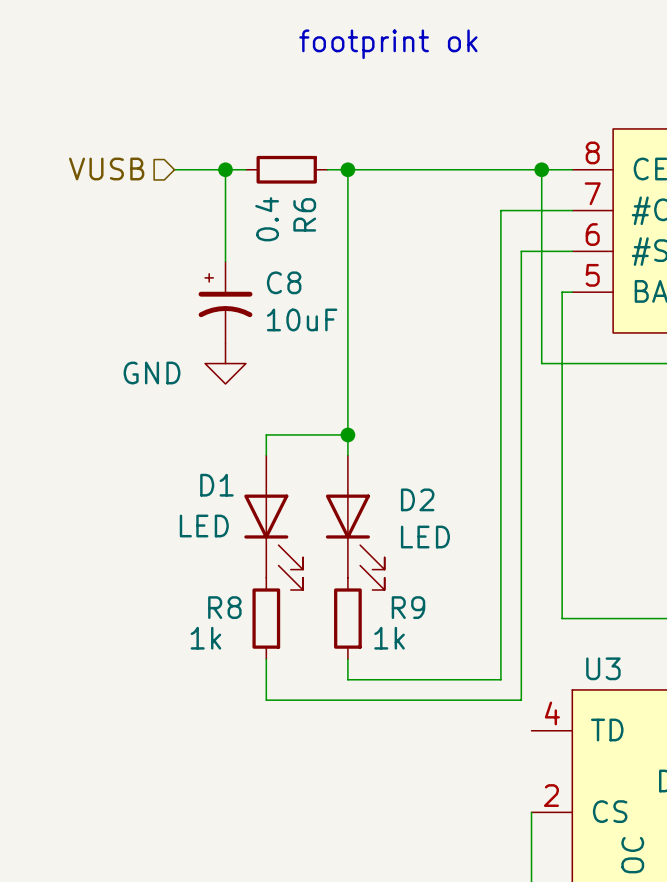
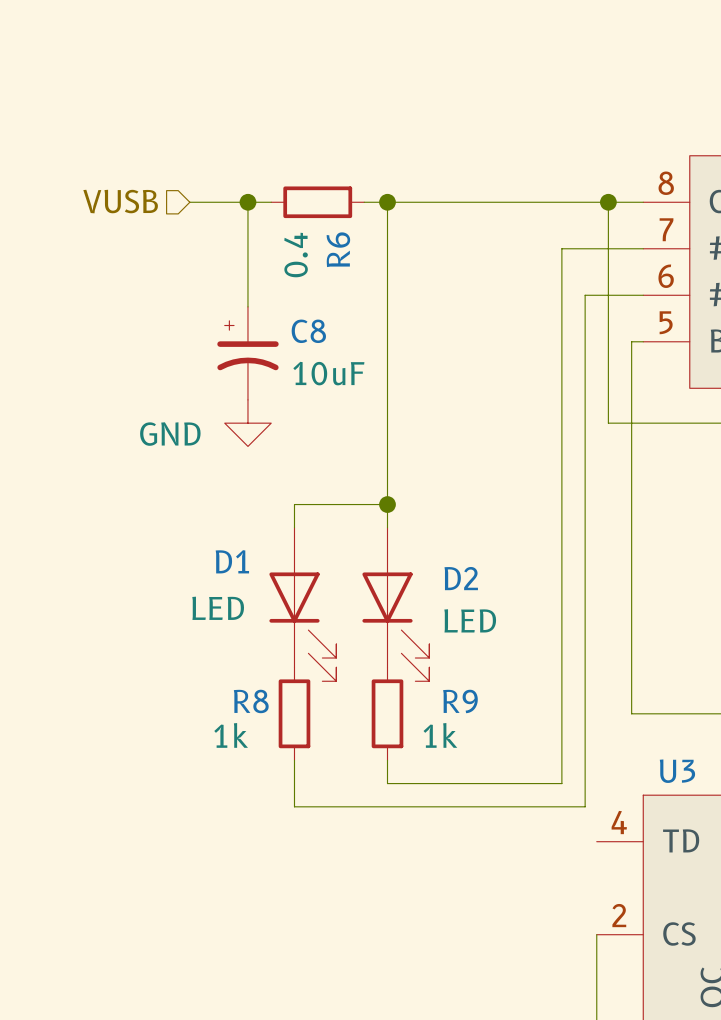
text: footprint ok (388, 44) -> none

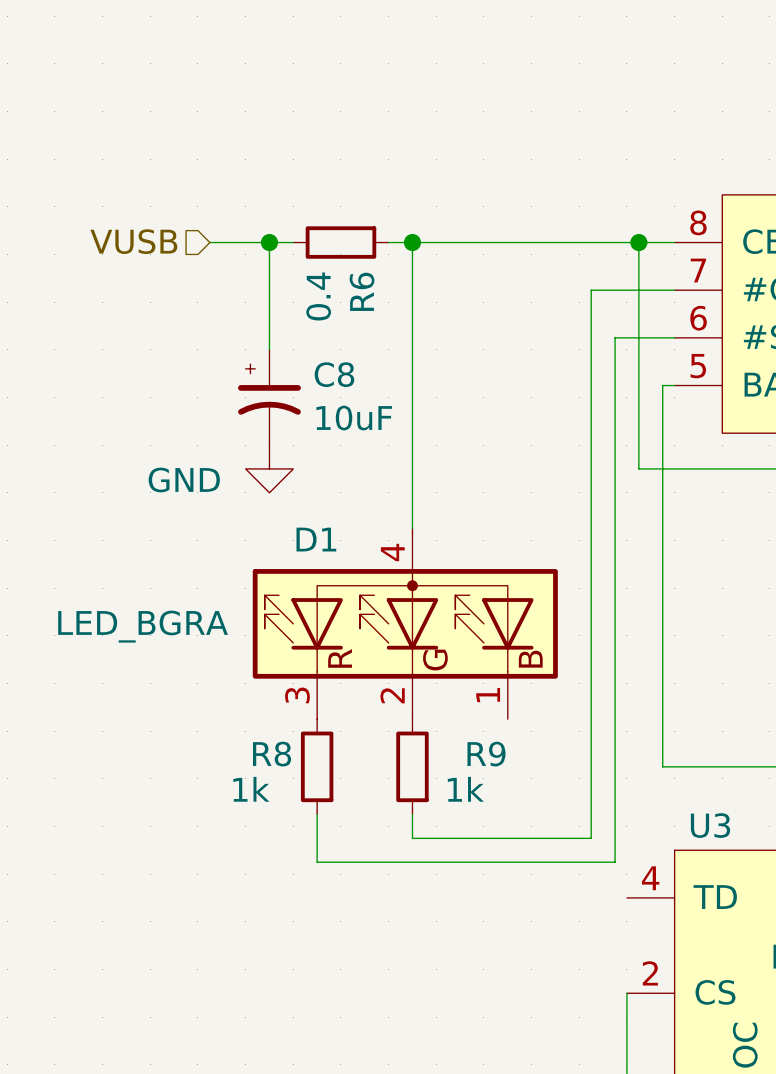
wire: (387, 504) (294, 504) (294, 527) -> none
junction: (387, 504) -> none
D1 symbol: [269, 527, 337, 682] -> [252, 528, 558, 720]
D1 name position: D1 (232, 561) -> D1 (316, 539)
D2: LED (395, 604) -> none
D1 value: LED (218, 608) -> LED_BGRA (143, 626)

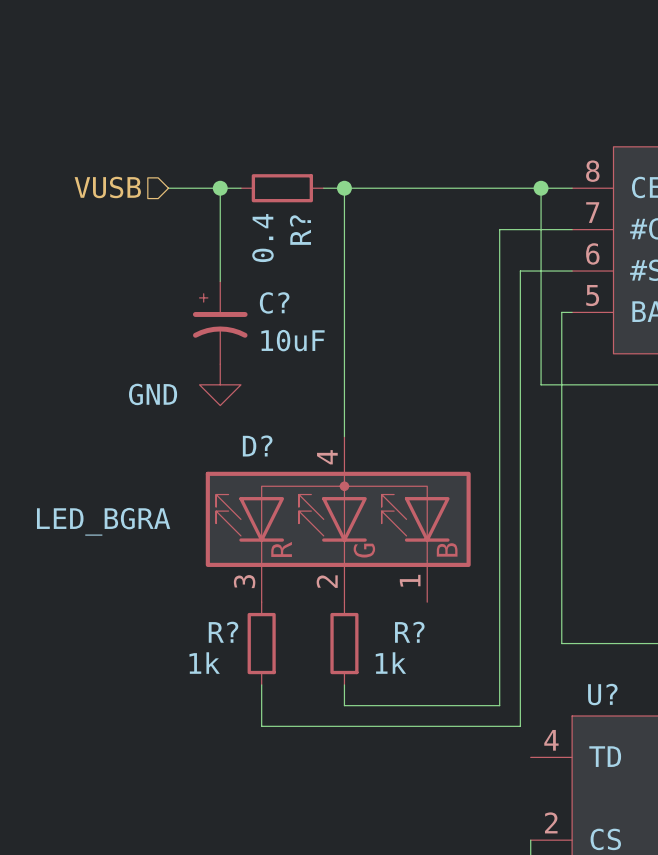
R6 name: R6 (362, 291) -> R? (300, 230)
C8 name: C8 (334, 374) -> C? (274, 302)
D1 name: D1 (316, 539) -> D? (257, 445)
R8 name: R8 (272, 754) -> R? (223, 632)
R9 name: R9 (486, 754) -> R? (409, 632)
U3 name: U3 (710, 825) -> U? (602, 694)

